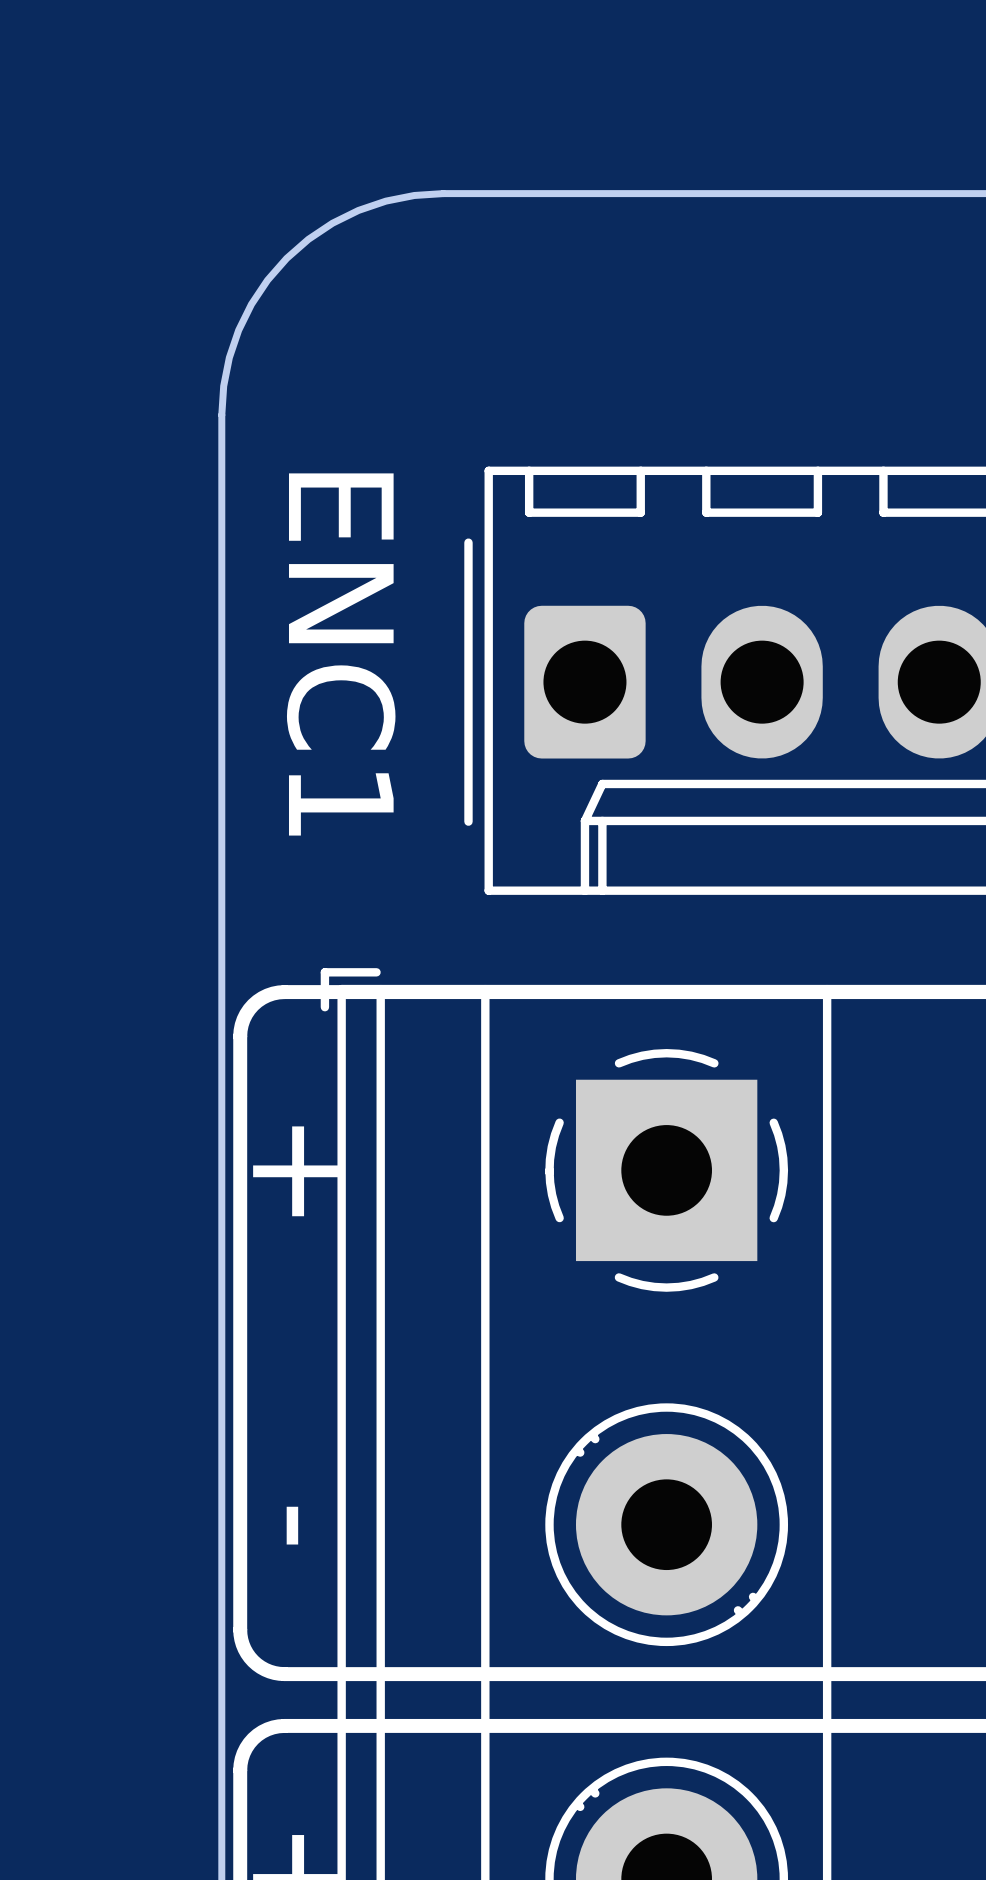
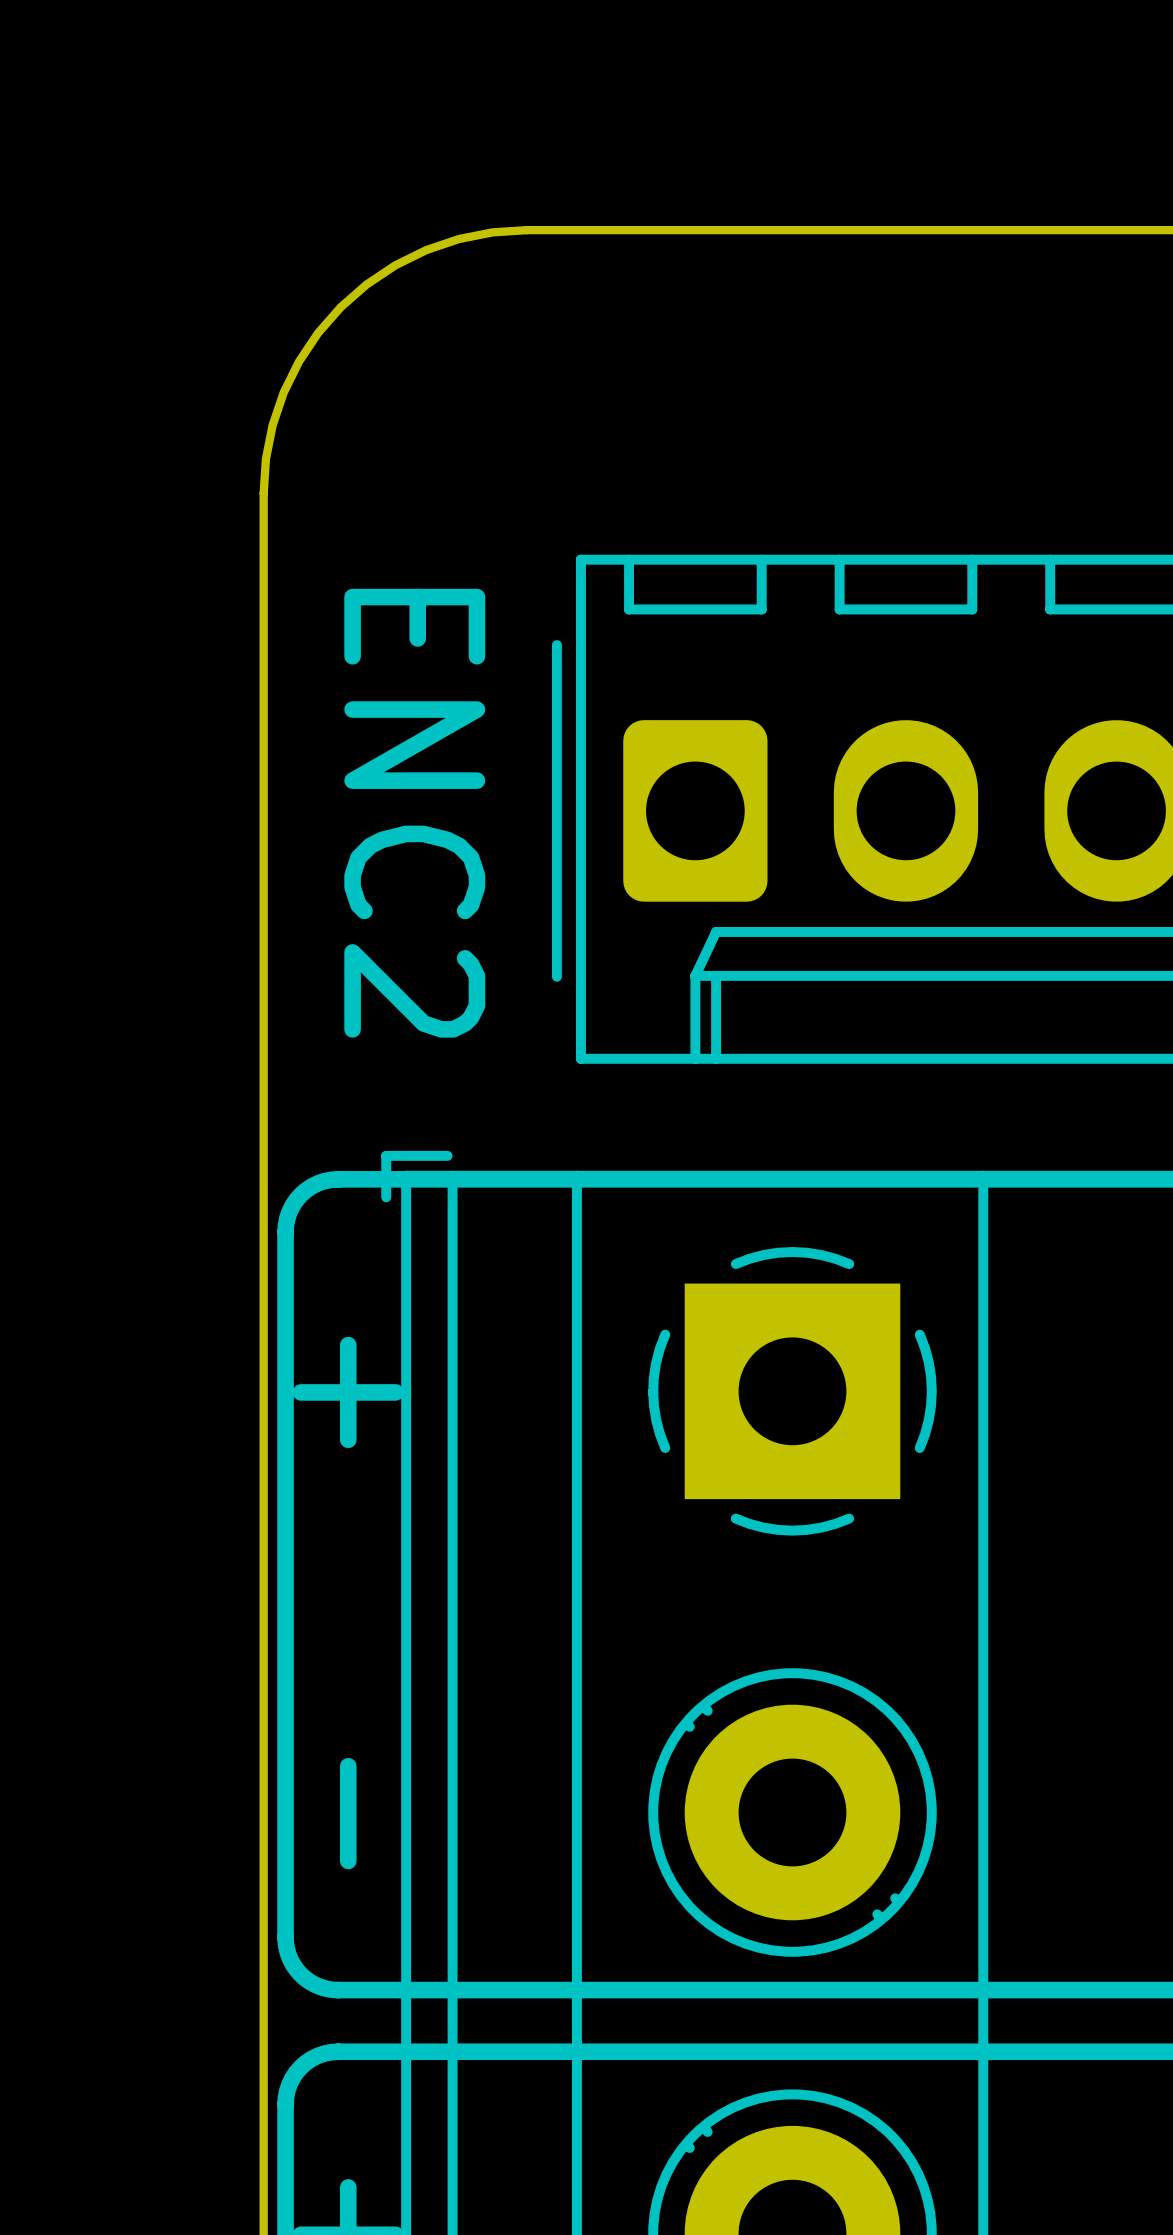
text: ENC1 (341, 654) -> ENC2 (414, 813)

